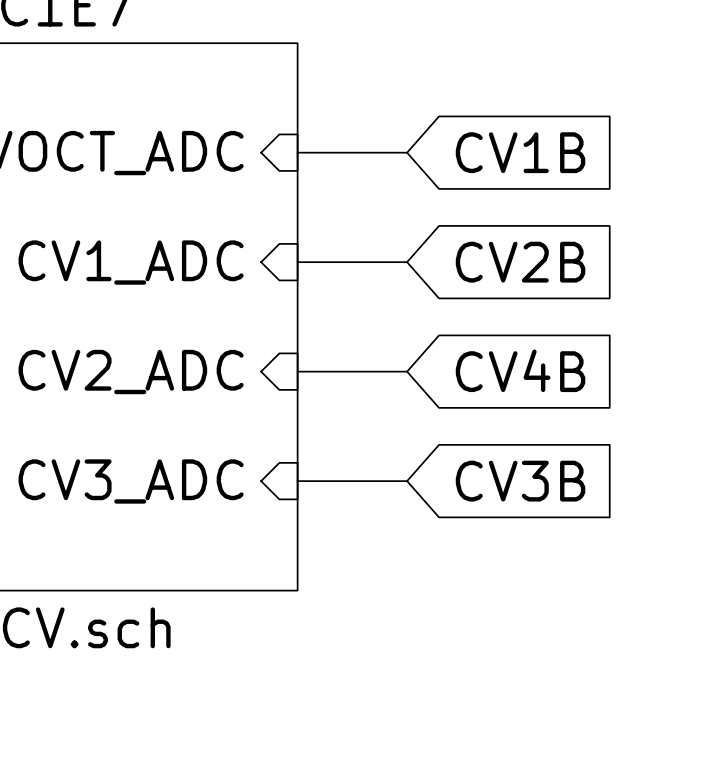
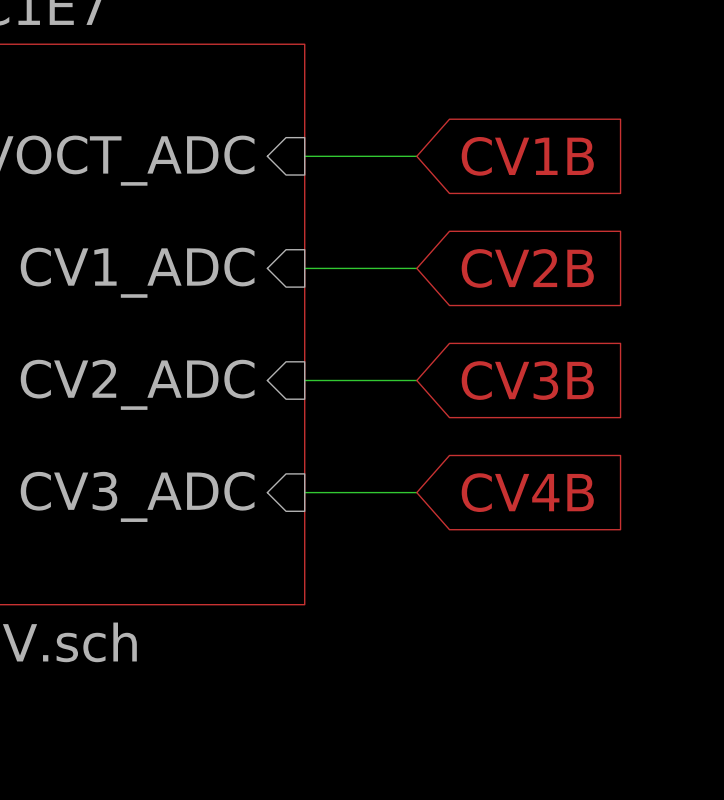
global label: CV4B (520, 370) -> CV3B (527, 380)
global label: CV3B (520, 481) -> CV4B (527, 492)

